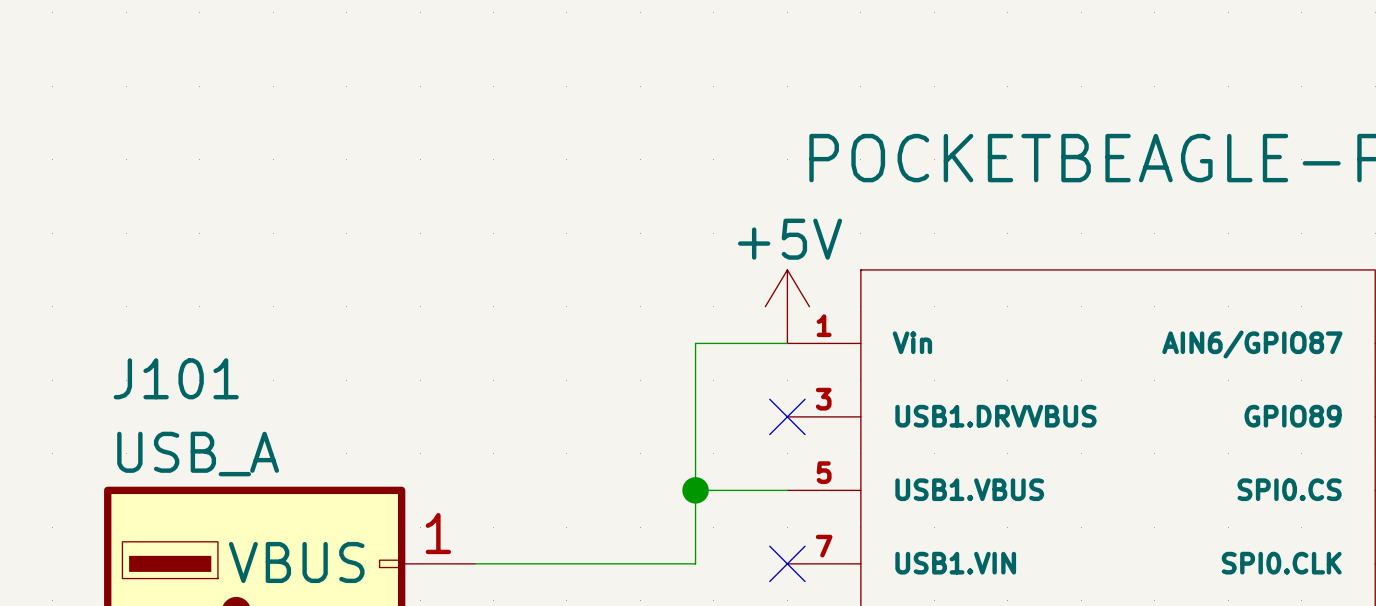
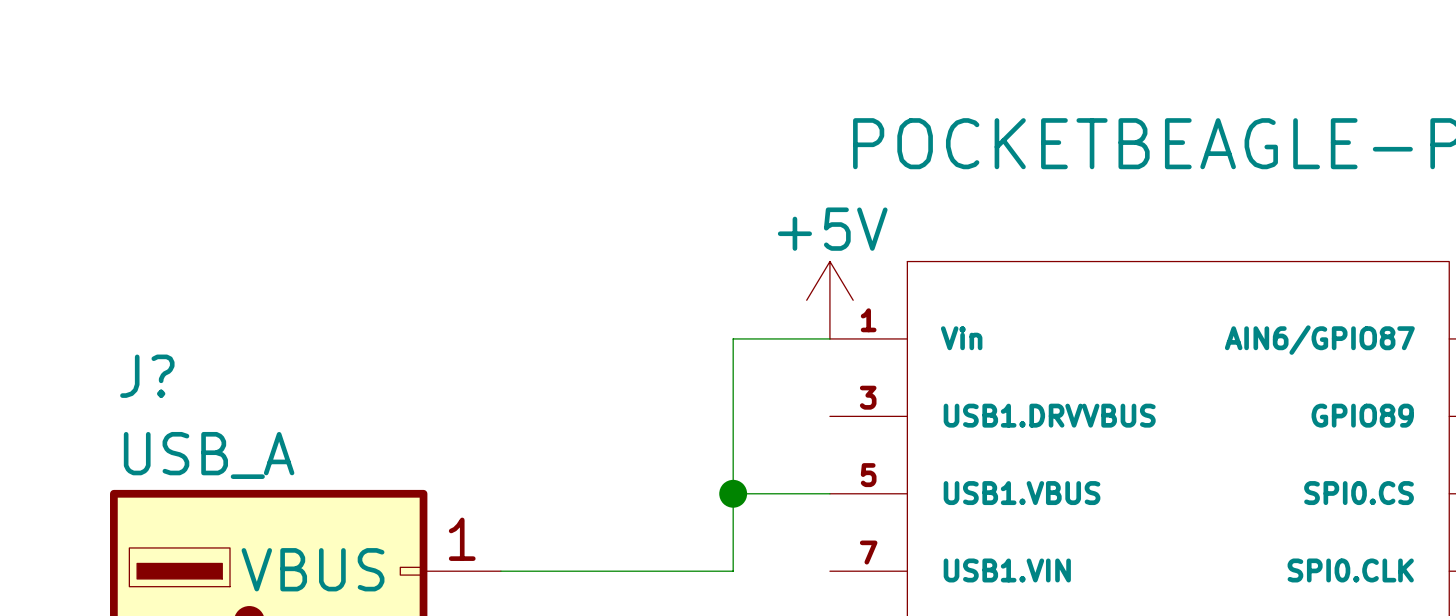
J101 name: J101 (176, 378) -> J? (147, 376)
no-connect mark: (787, 416) -> none
no-connect mark: (787, 563) -> none

